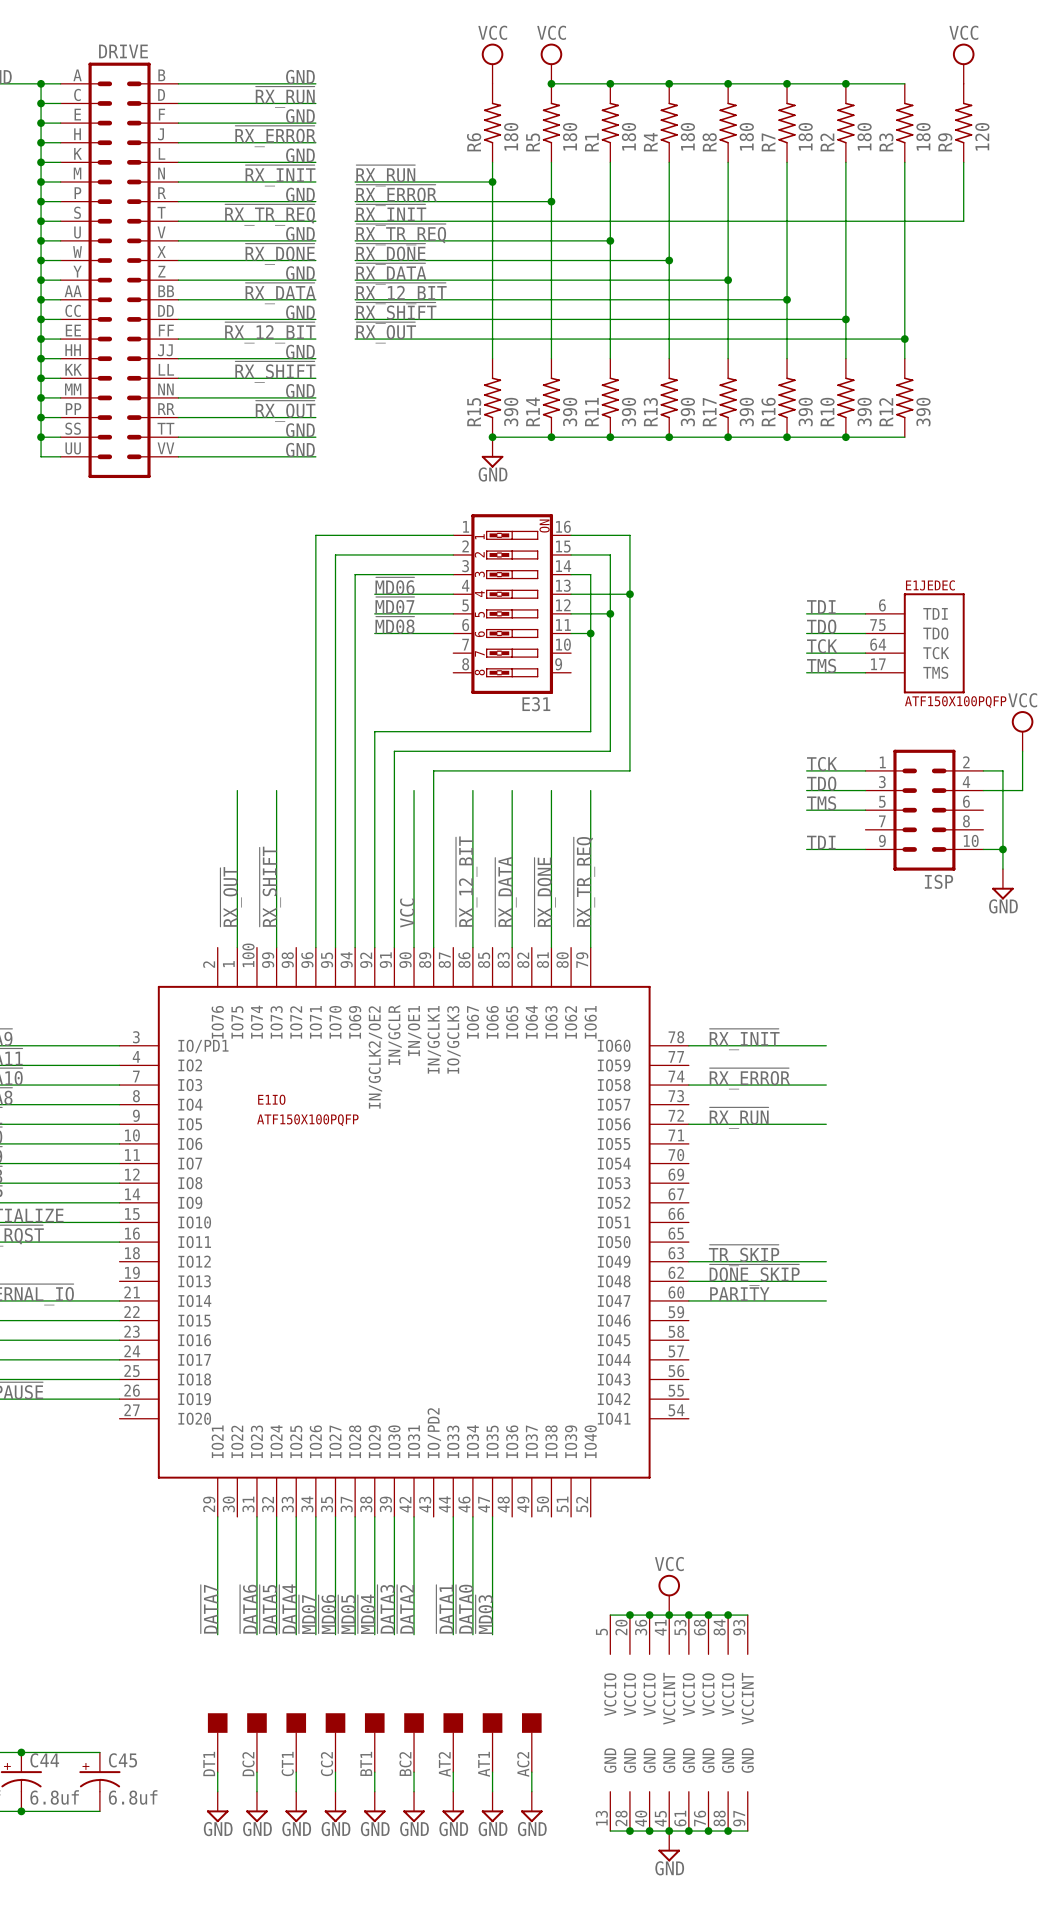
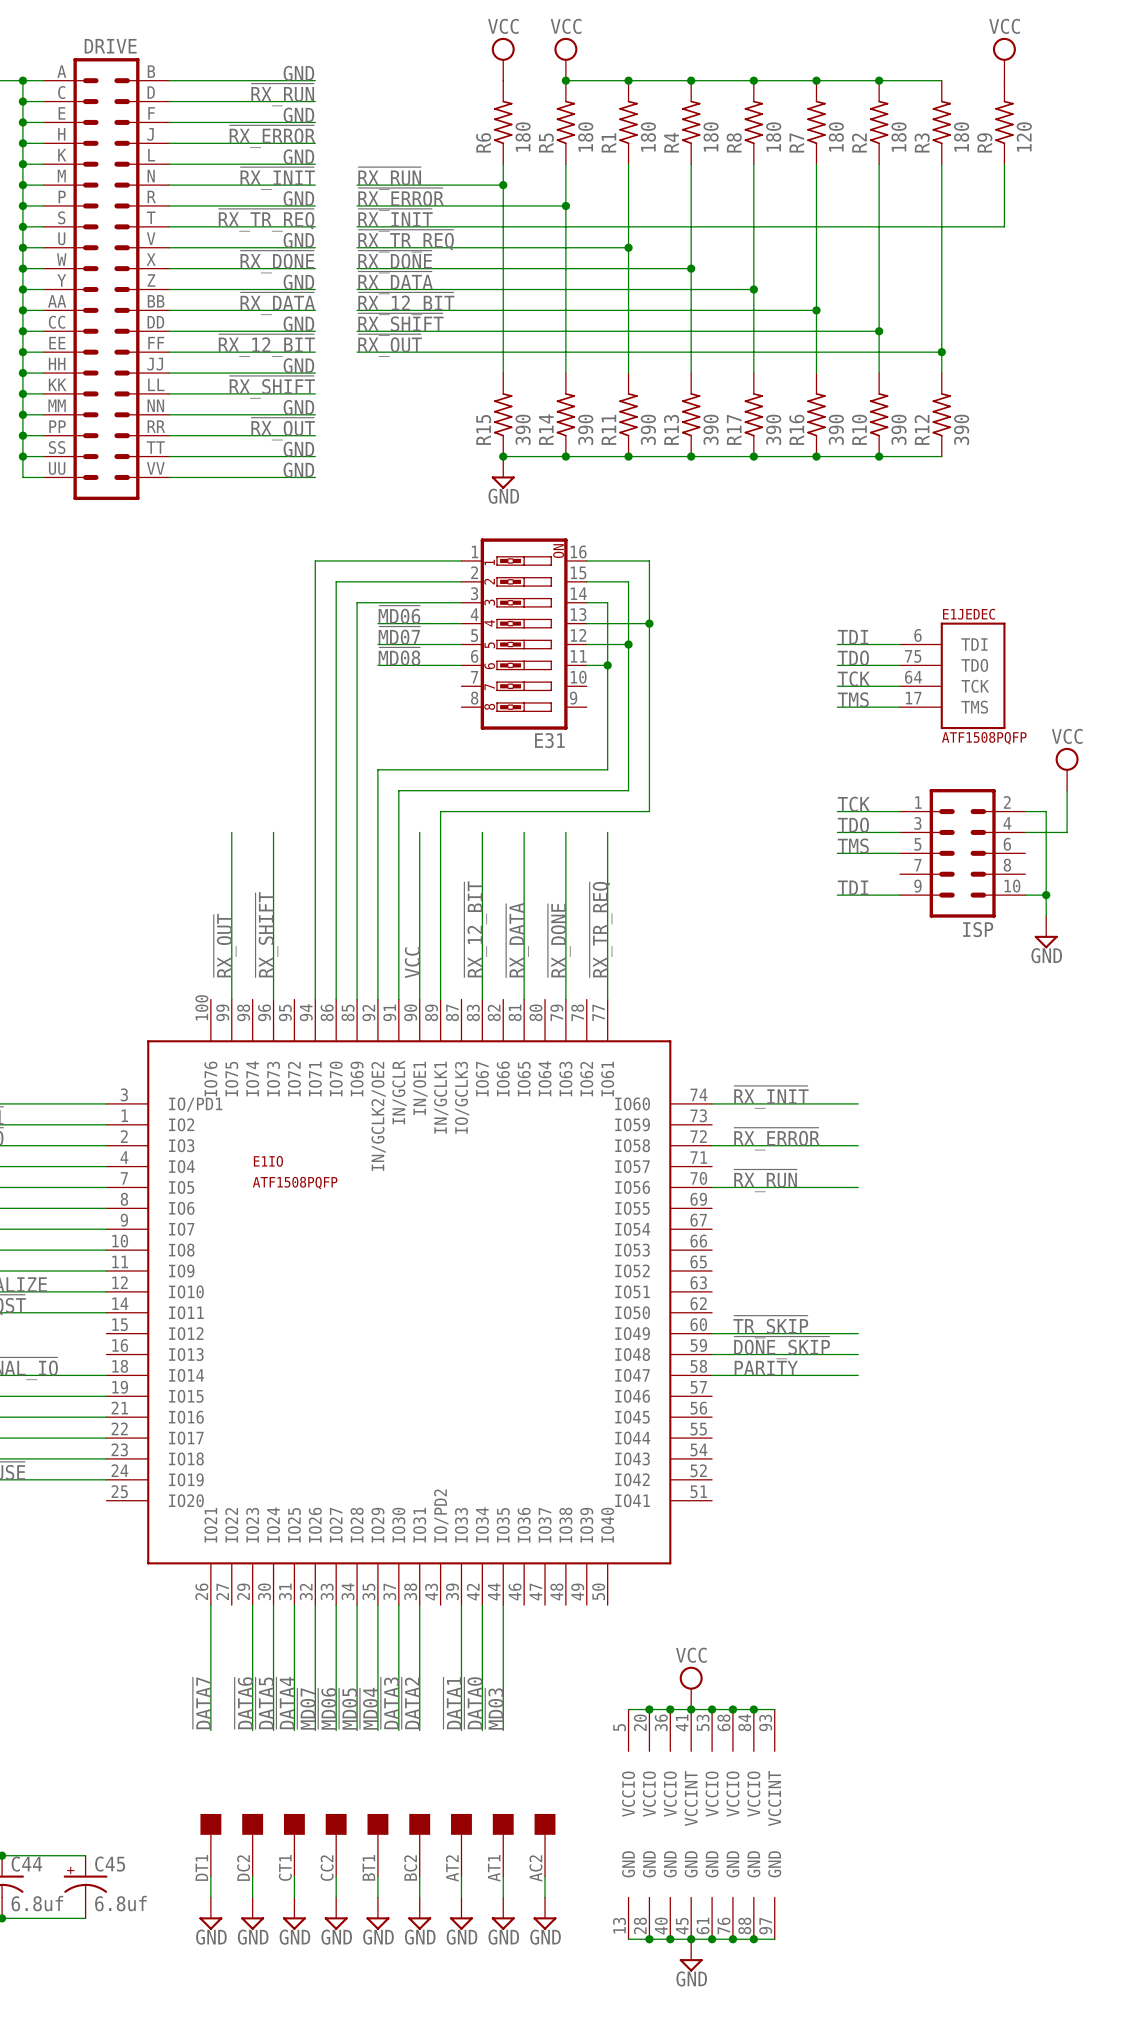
E1JEDEC value: ATF150X100PQFP (955, 702) -> ATF1508PQFP (984, 738)
E1IO symbol: [119, 947, 689, 1517] -> [106, 999, 713, 1606]
E1IO value: ATF150X100PQFP (307, 1120) -> ATF1508PQFP (295, 1183)

